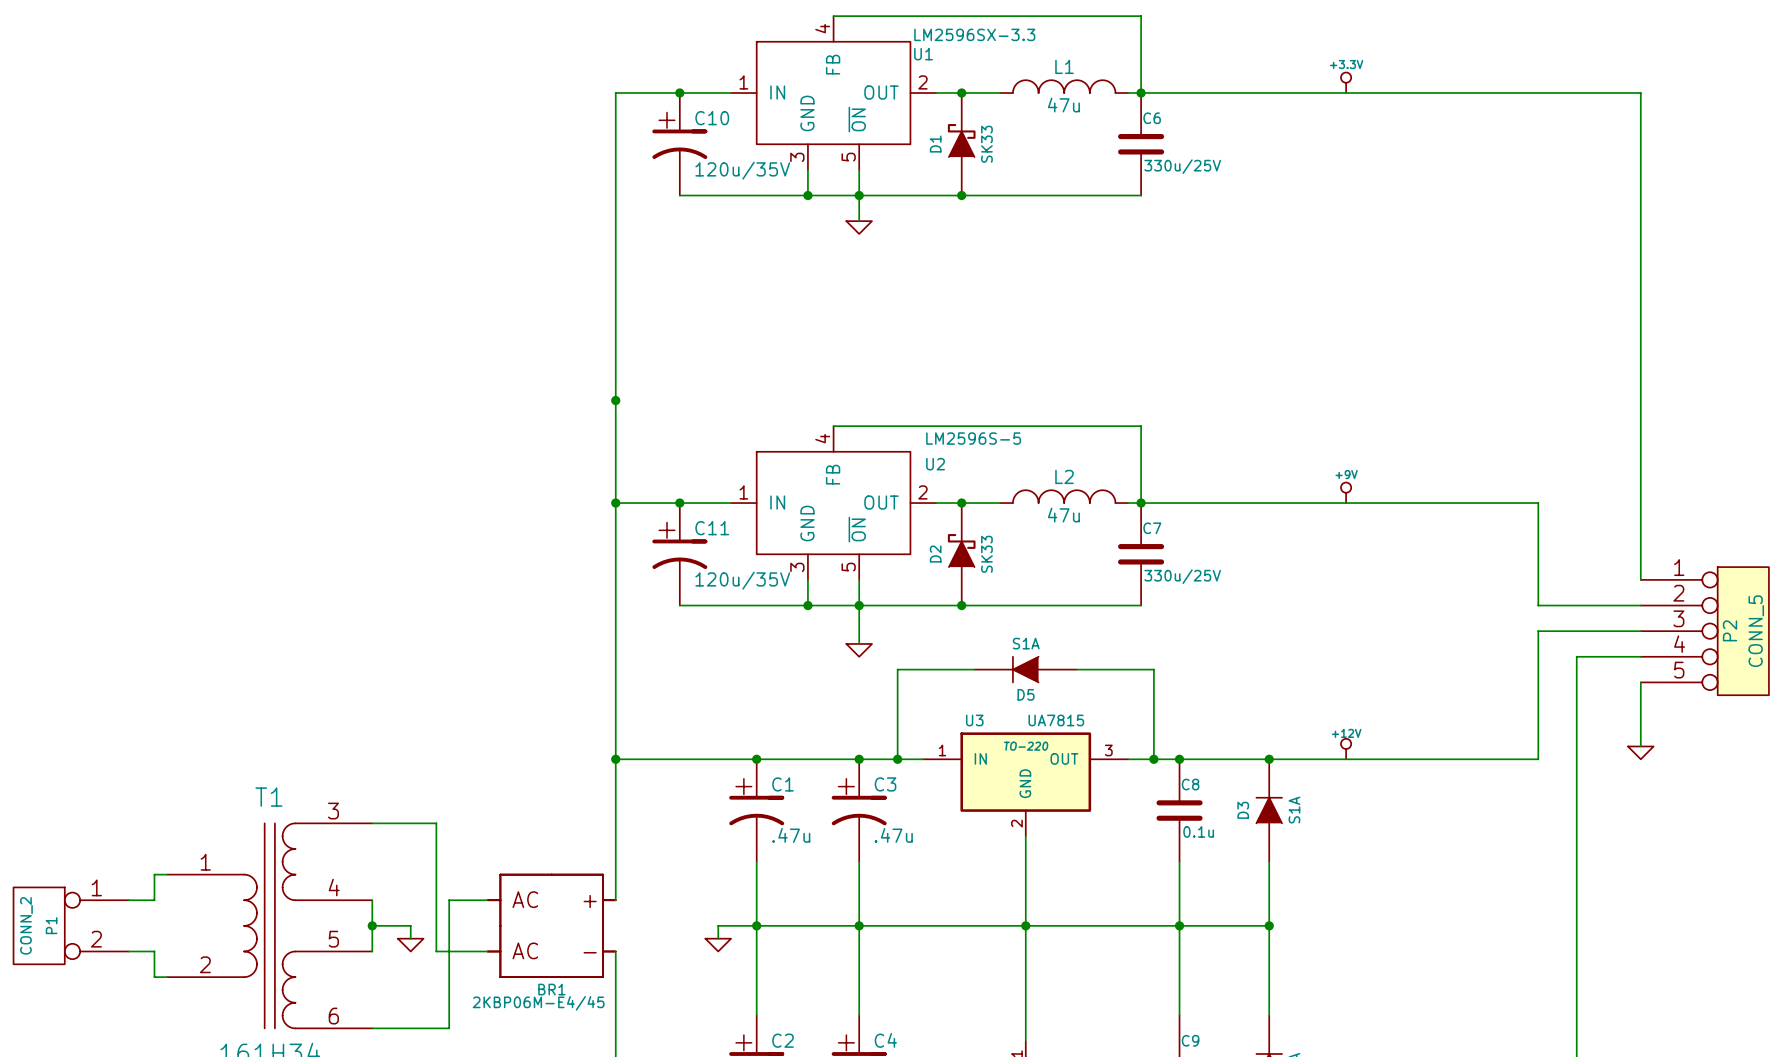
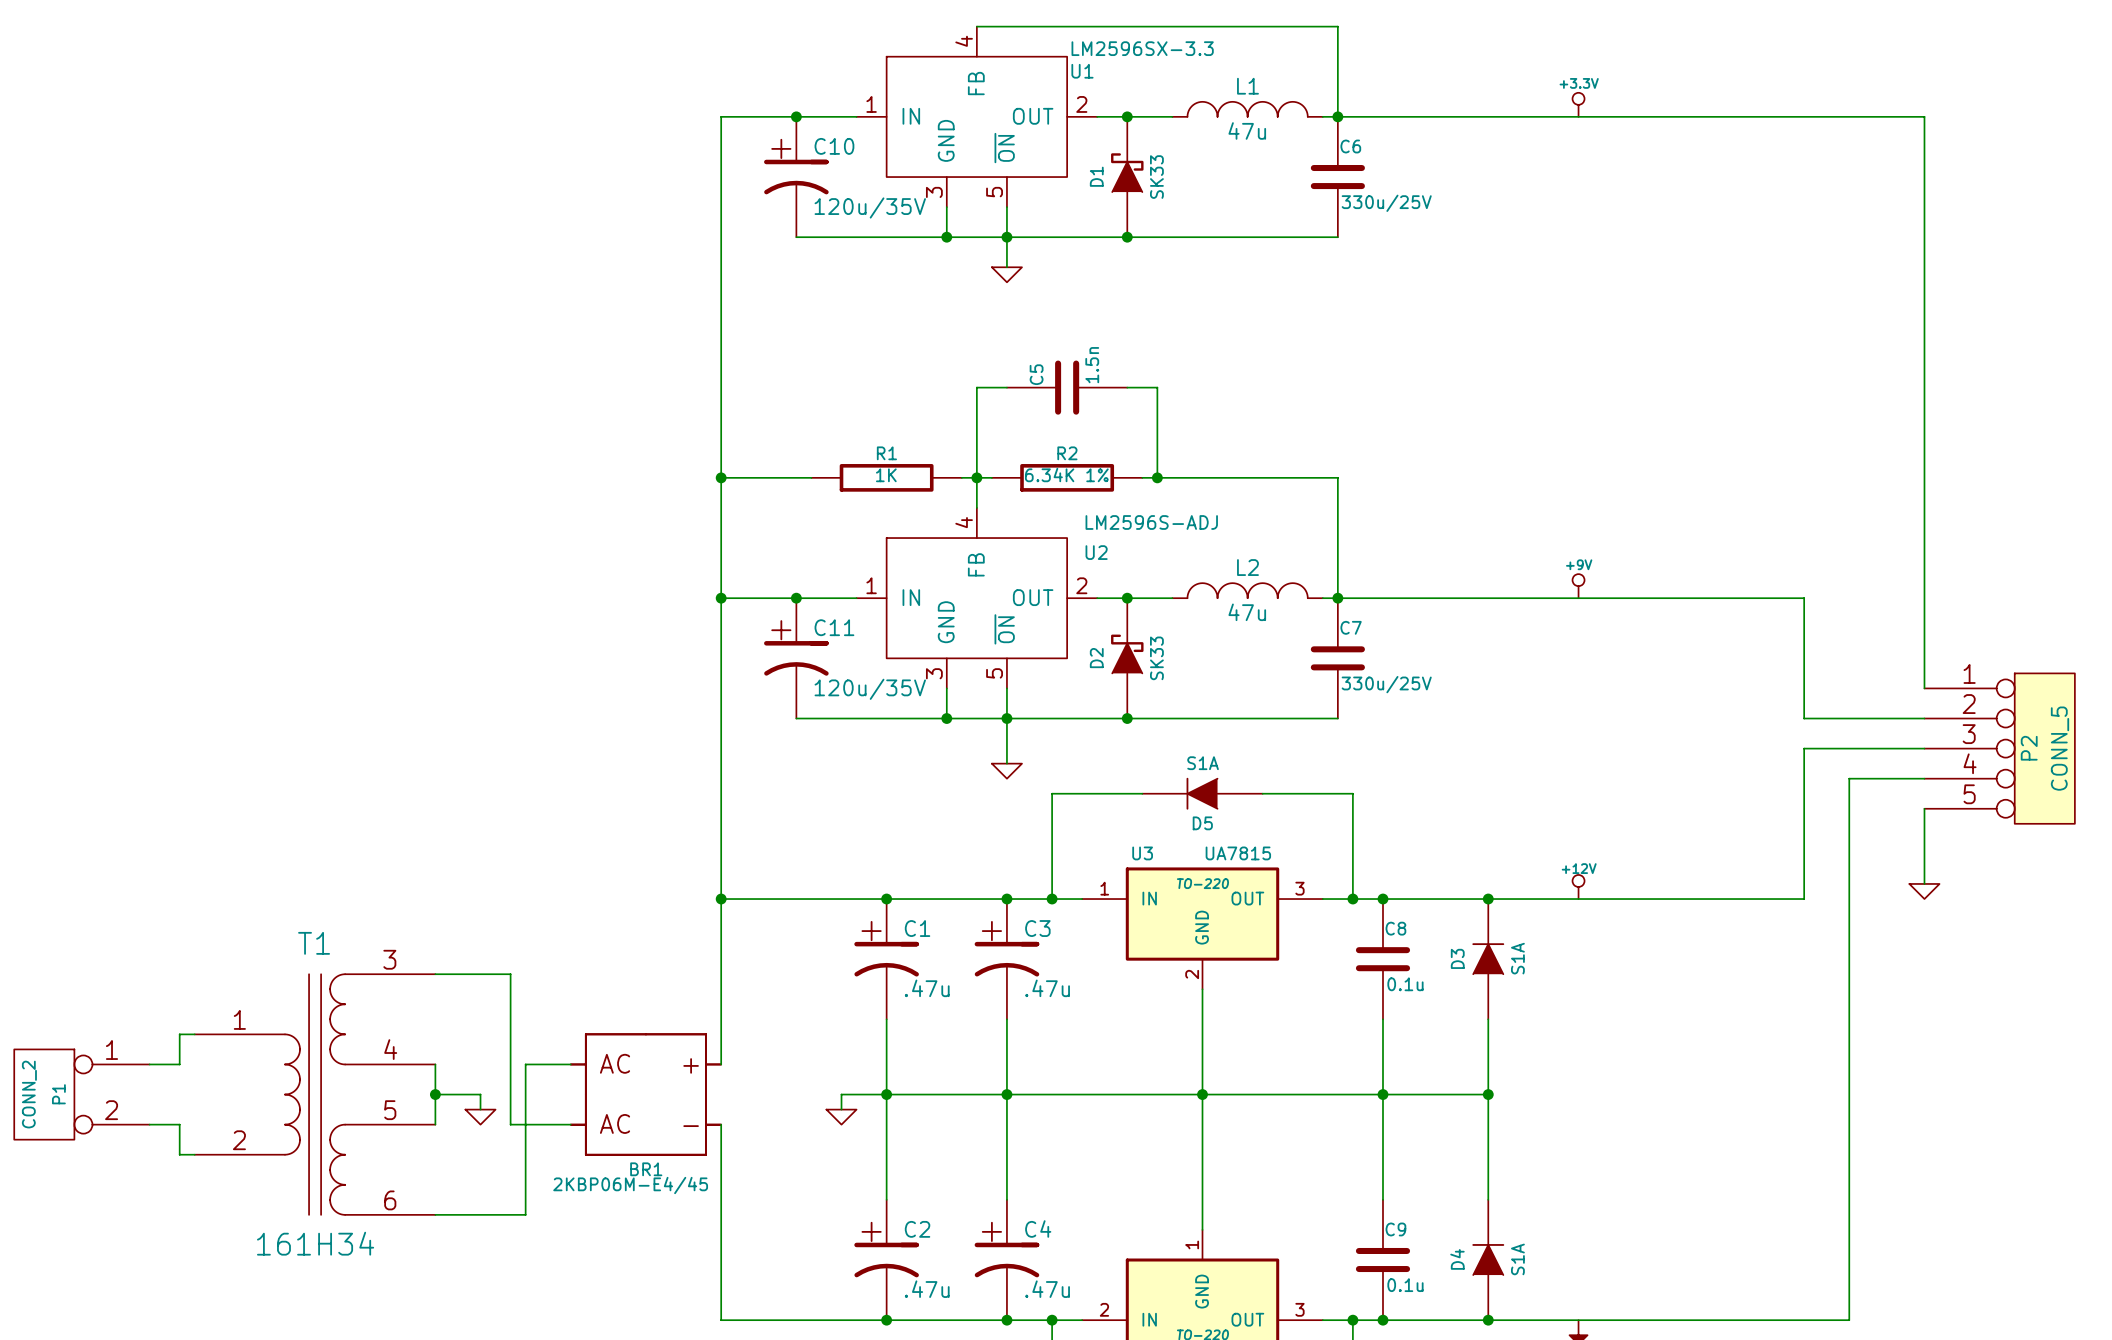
wire: none -> (1006, 387) (976, 387) (976, 507)
C5: none -> 1.5n (1067, 387)
wire: none -> (1127, 387) (1157, 387) (1157, 477)
wire: none -> (721, 477) (811, 477)
R1: none -> 1K (886, 477)
wire: none -> (961, 477) (991, 477)
junction: none -> (976, 477)
R2: none -> 6.34K 1% (1067, 477)
junction: none -> (1157, 477)
wire: (833, 426) (1141, 426) -> (1142, 477) (1337, 477) (1337, 507)
U2 value: LM2596S-5 (973, 438) -> LM2596S-ADJ (1151, 522)

